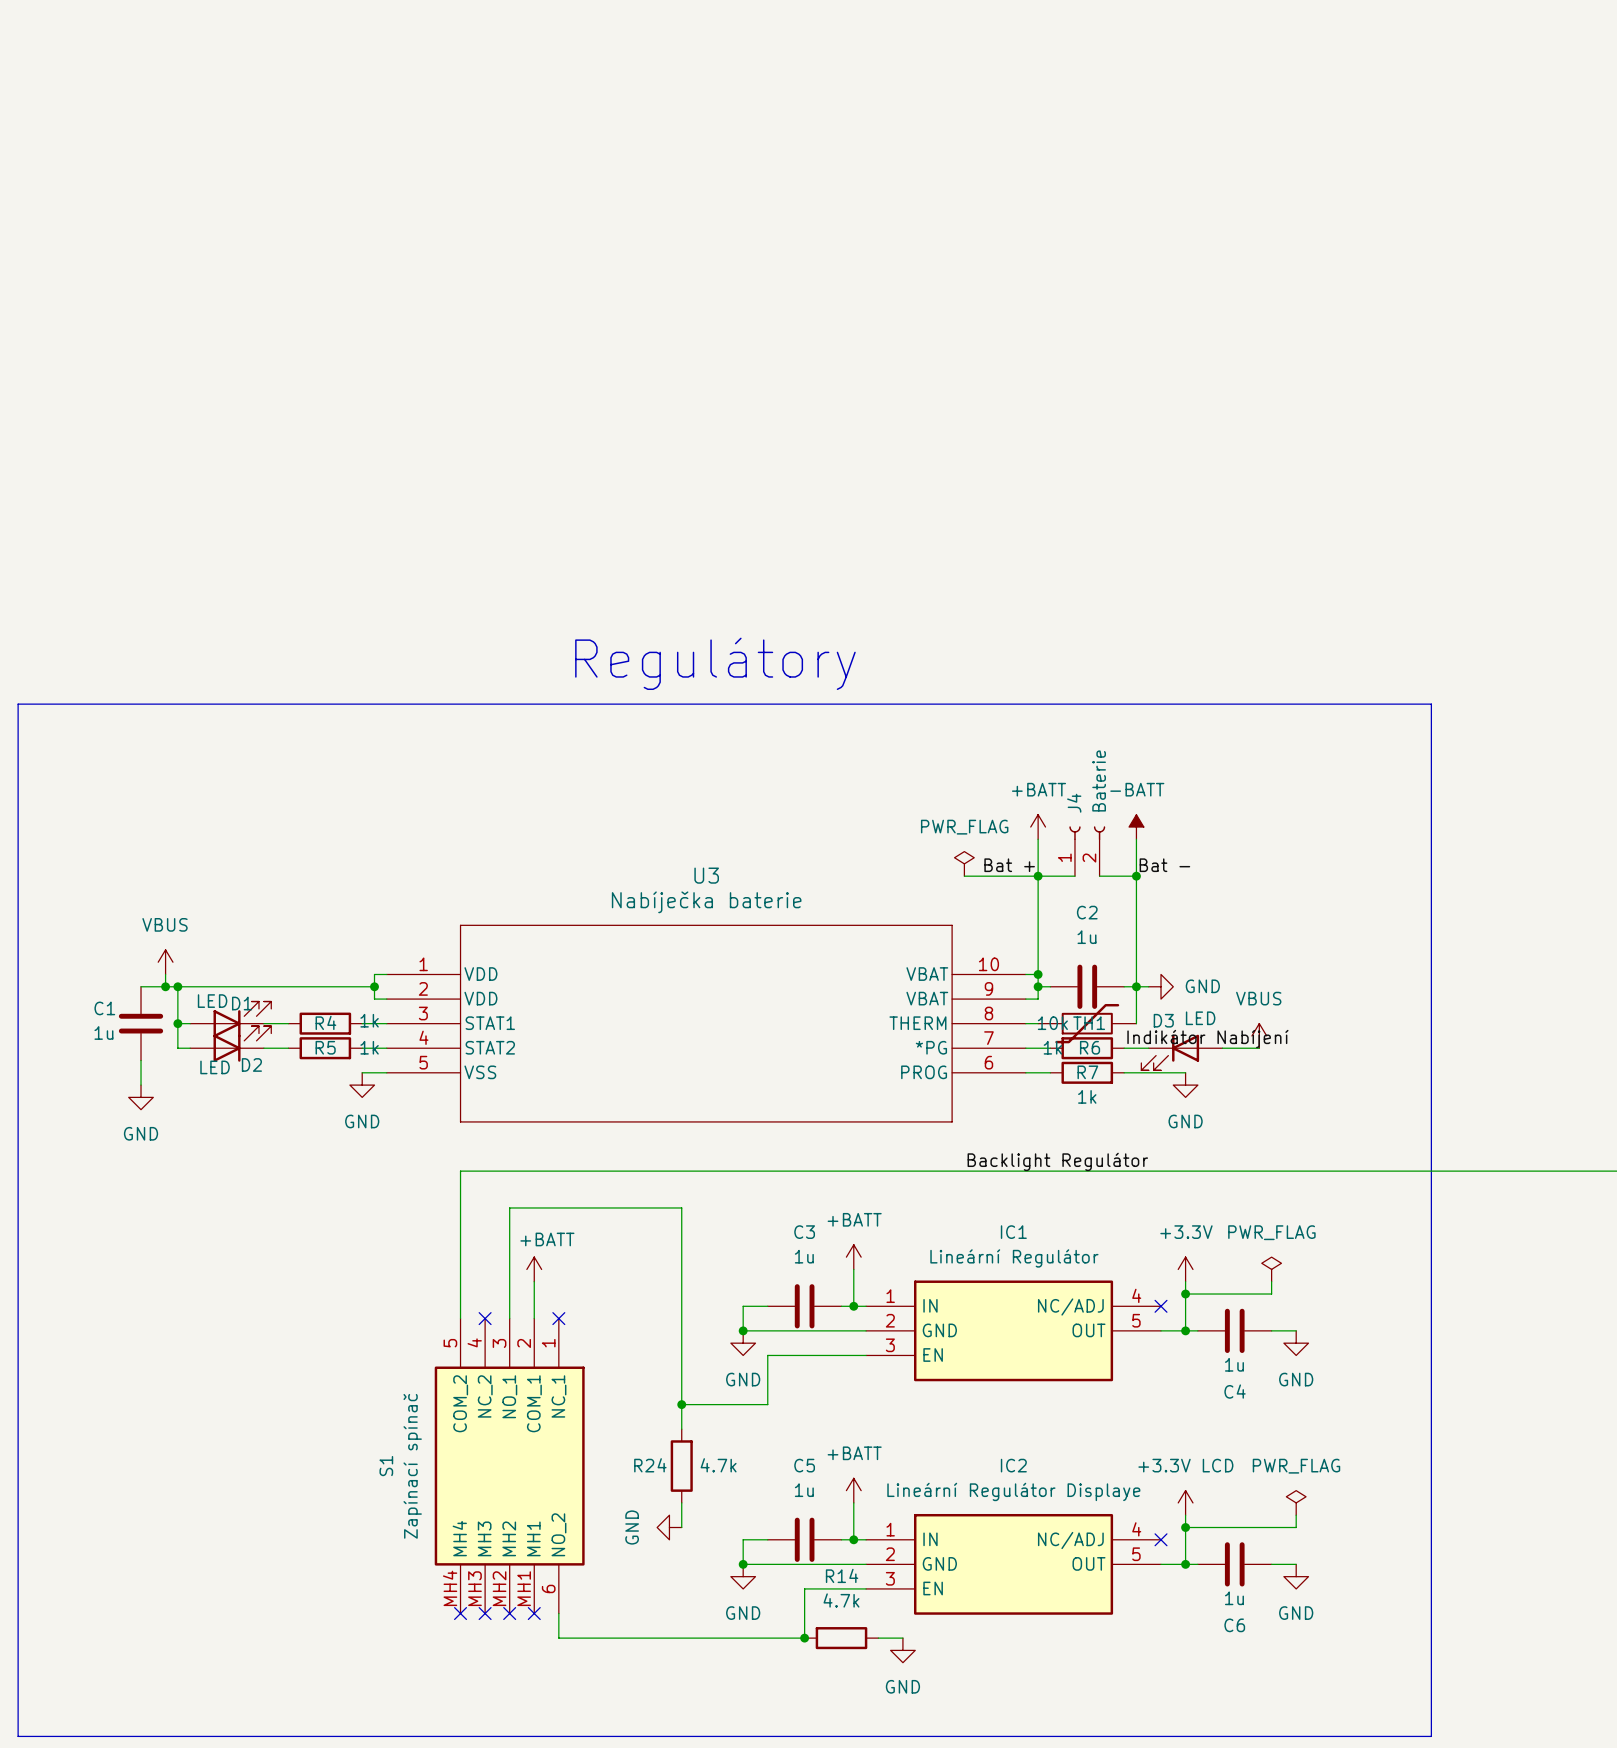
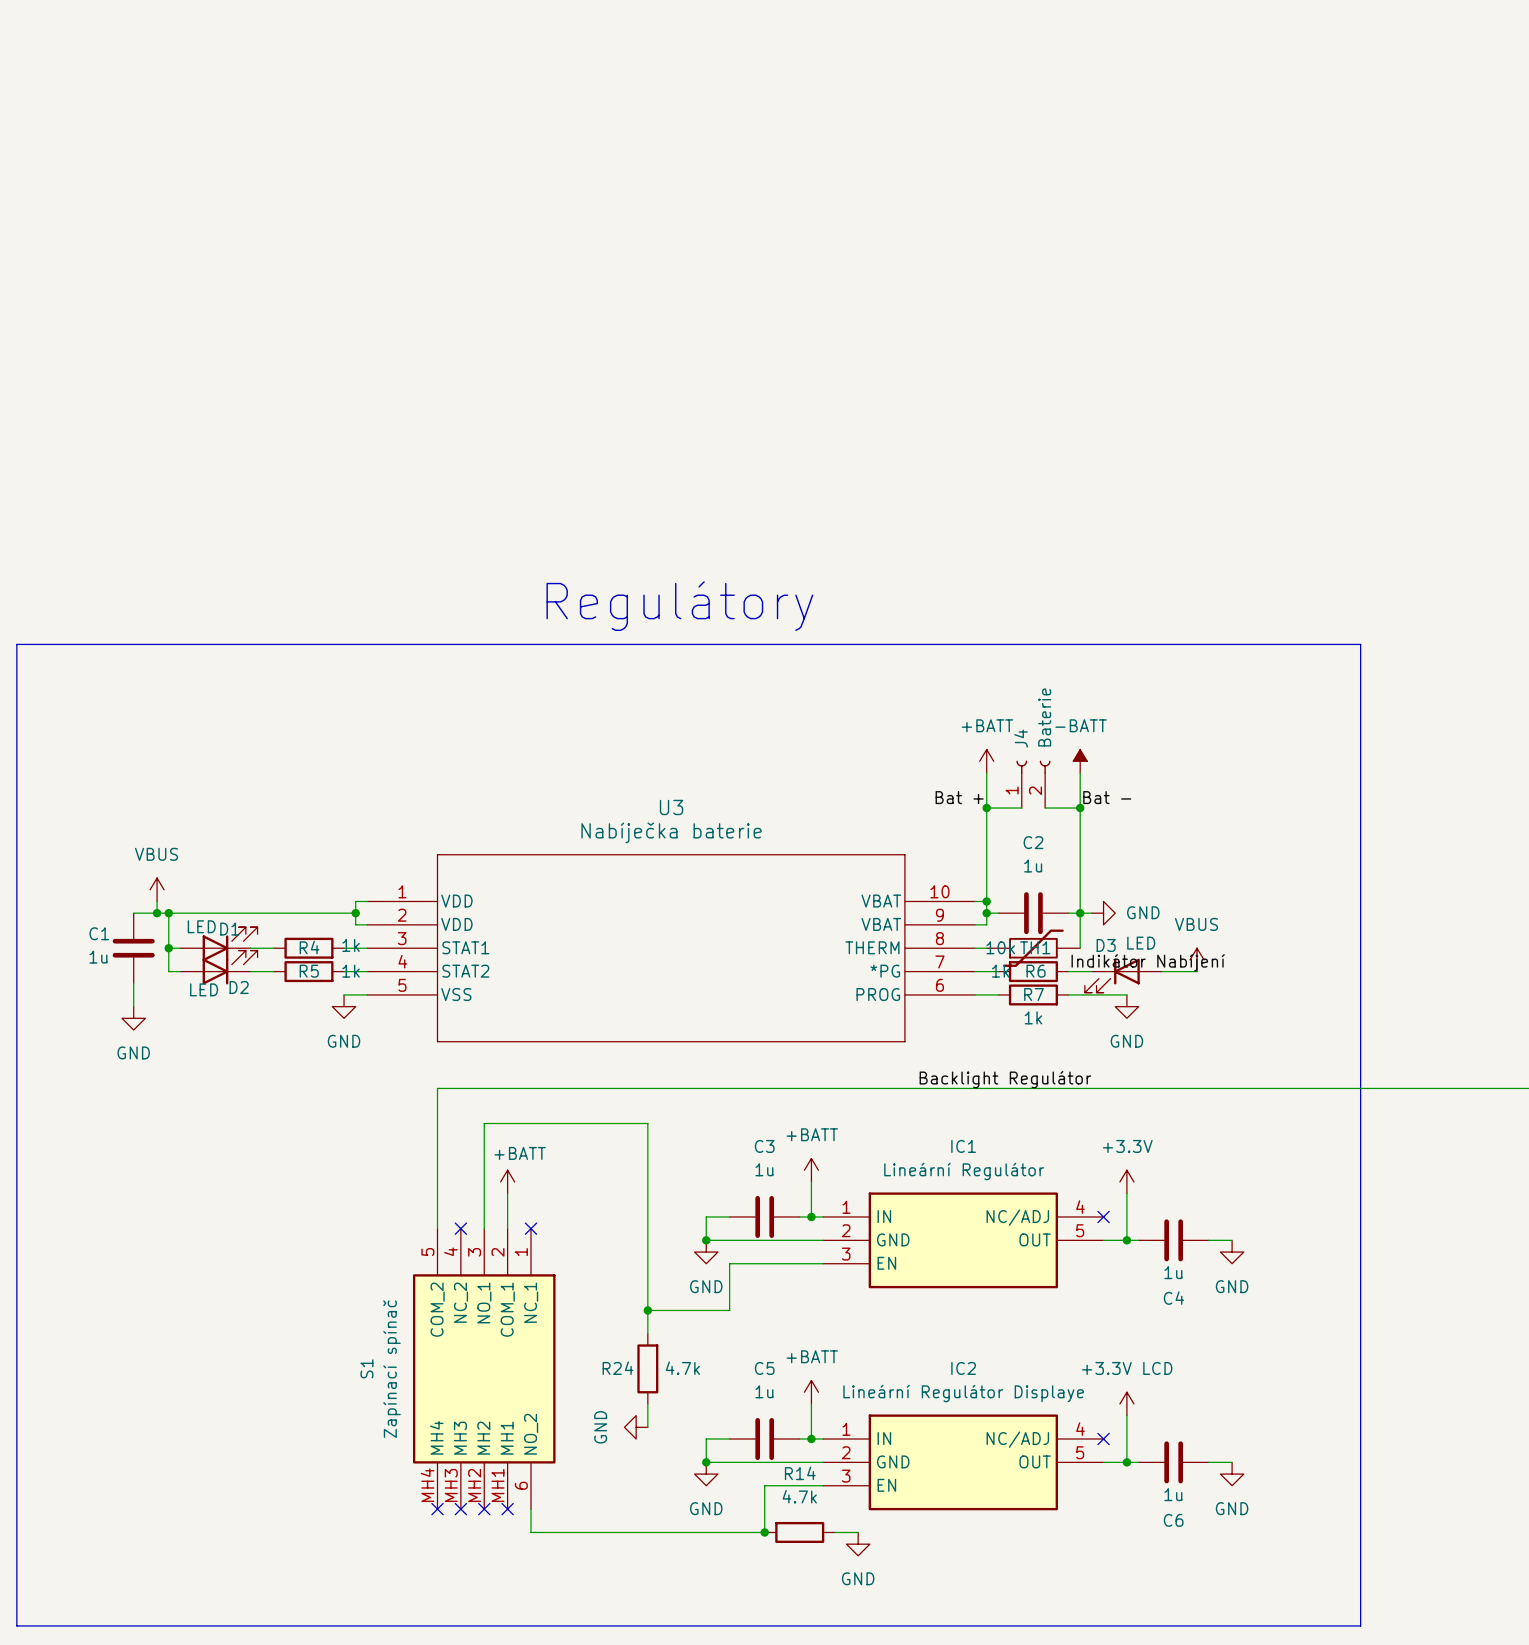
power symbol: PWR_FLAG (964, 863) -> none
wire: (964, 876) (1038, 876) -> none
power symbol: PWR_FLAG (1271, 1269) -> none
wire: (1271, 1281) (1271, 1294) (1185, 1294) -> none
junction: (1185, 1294) -> none
power symbol: PWR_FLAG (1296, 1502) -> none
wire: (1296, 1515) (1296, 1527) (1185, 1527) -> none
junction: (1185, 1527) -> none

